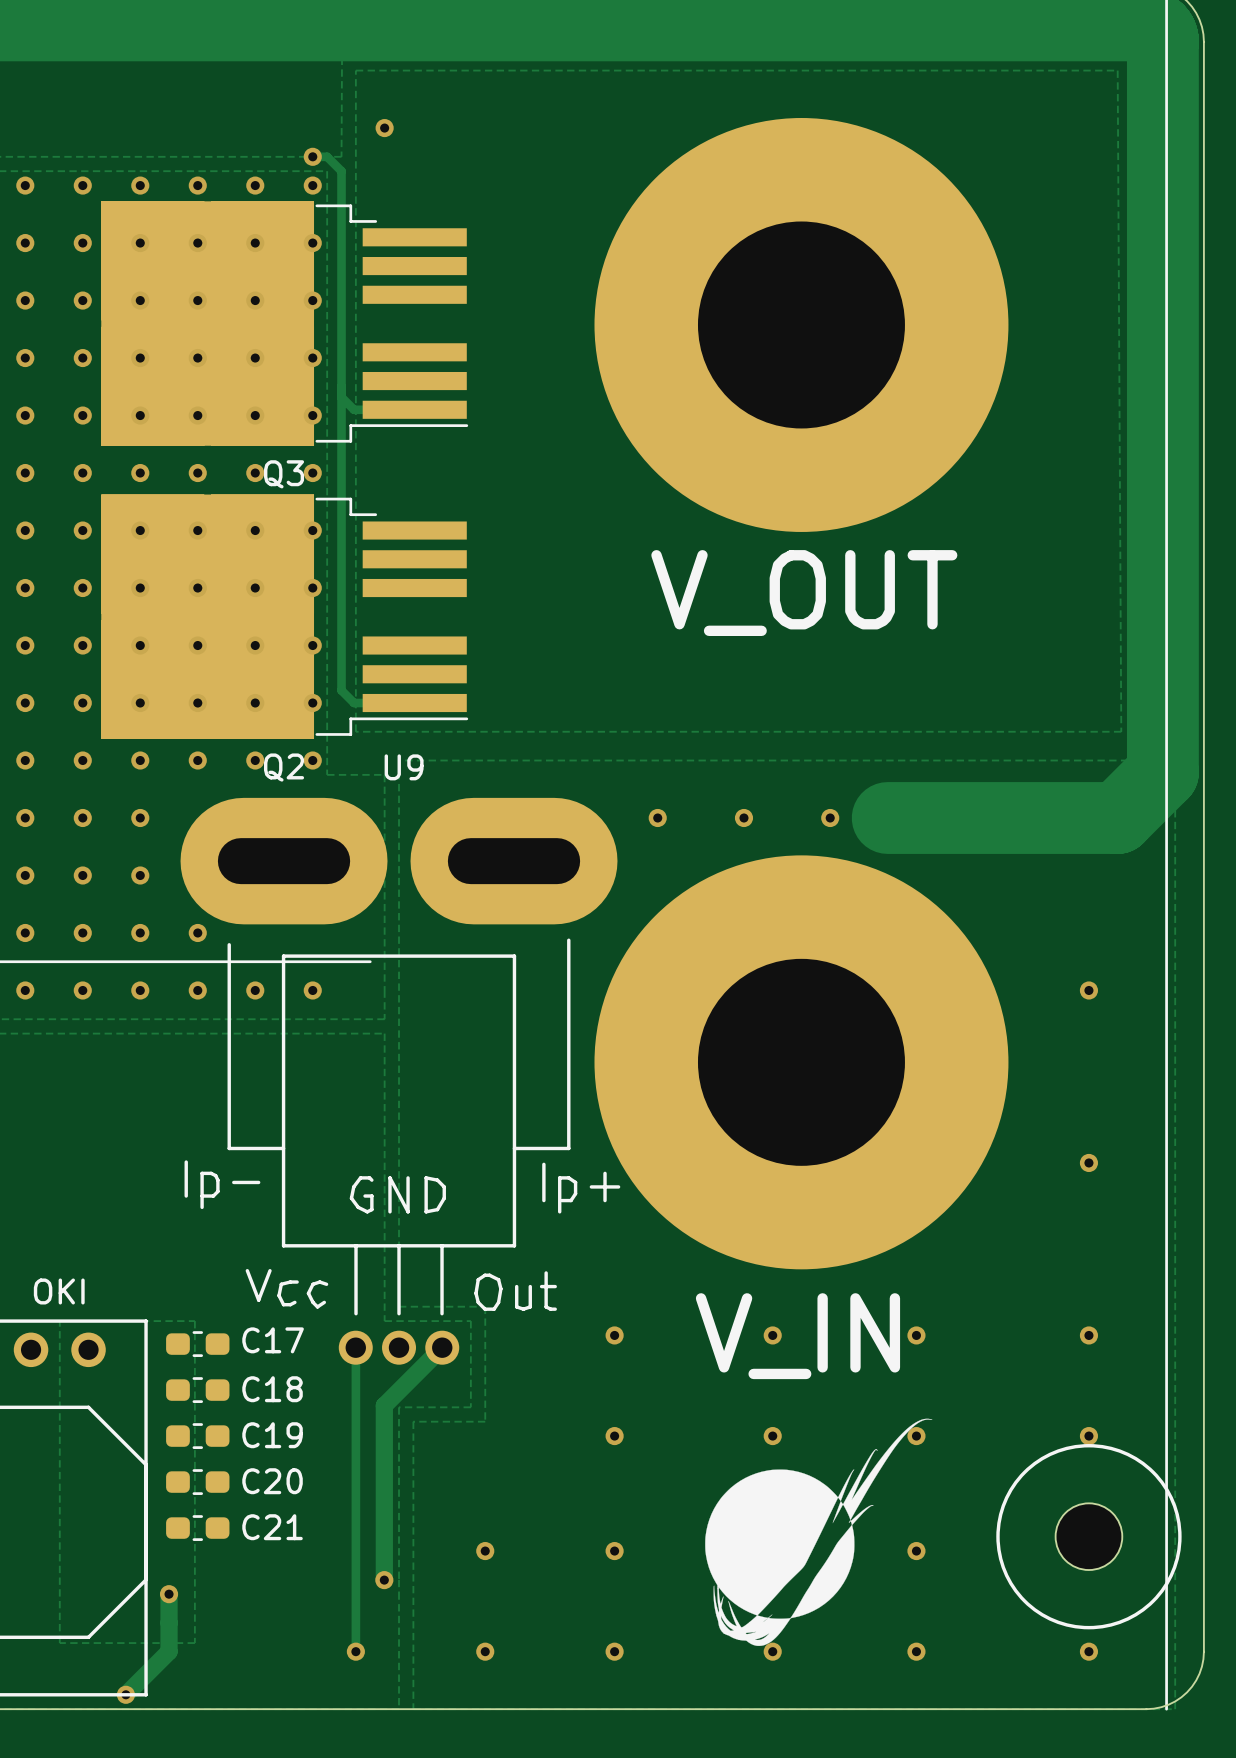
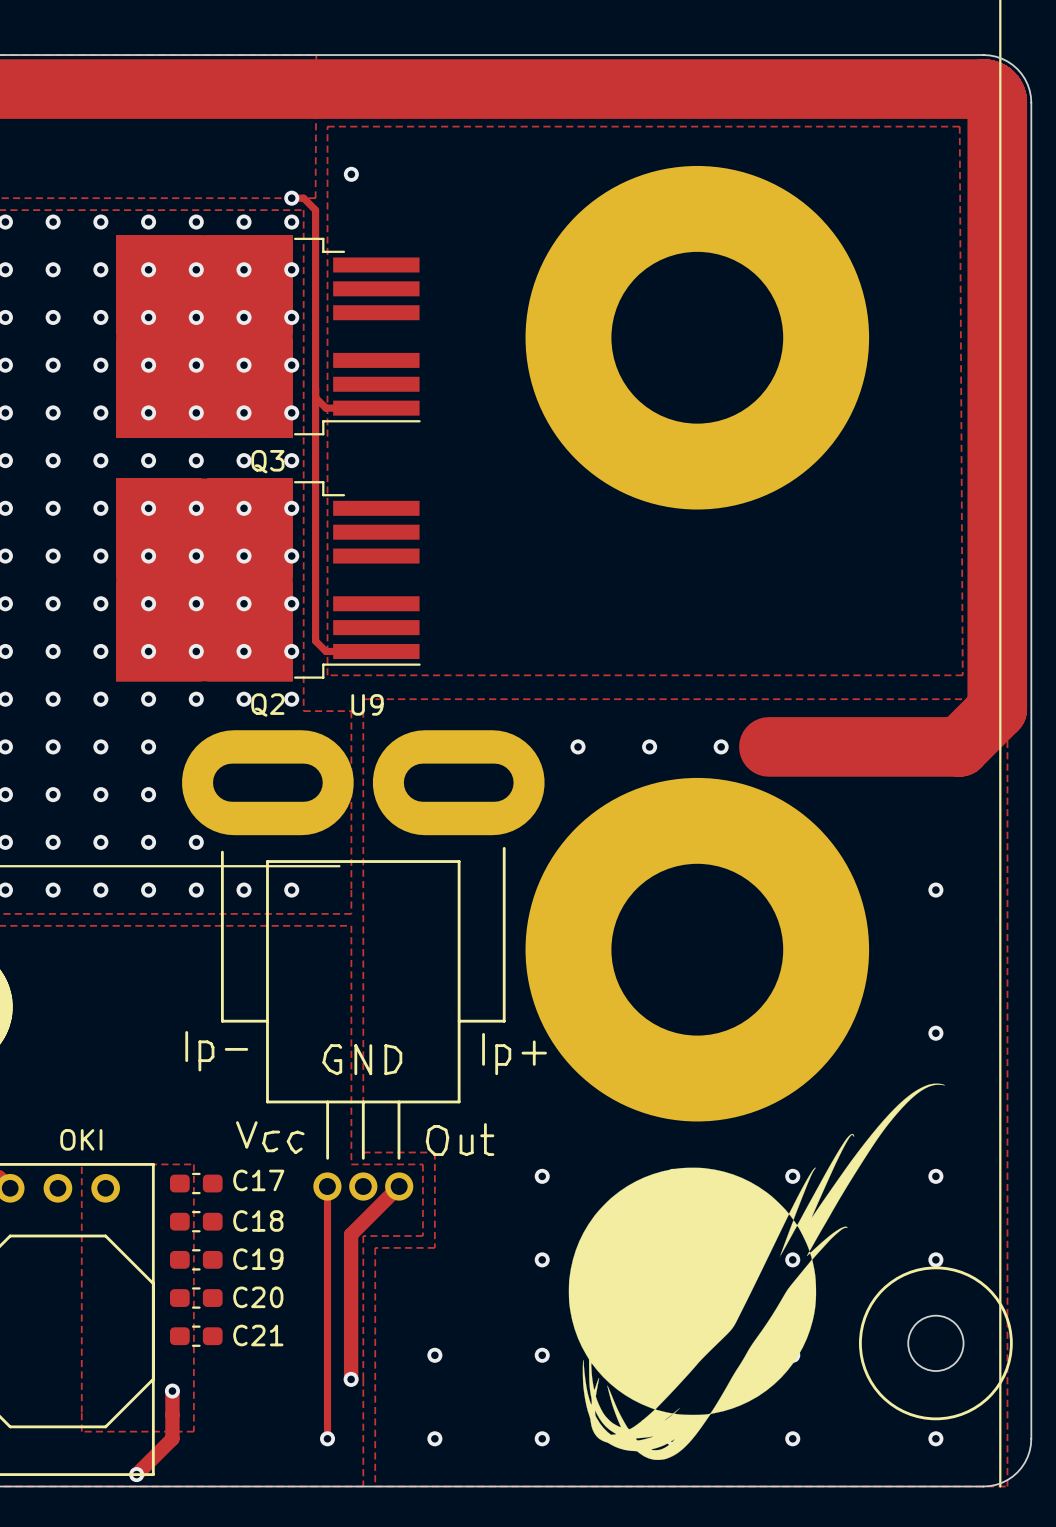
text: V_OUT (804, 593) -> none
drawing: none -> [568, 1083, 946, 1460]
text: V_IN (797, 1336) -> none
drawing: [705, 1418, 933, 1646] -> none

